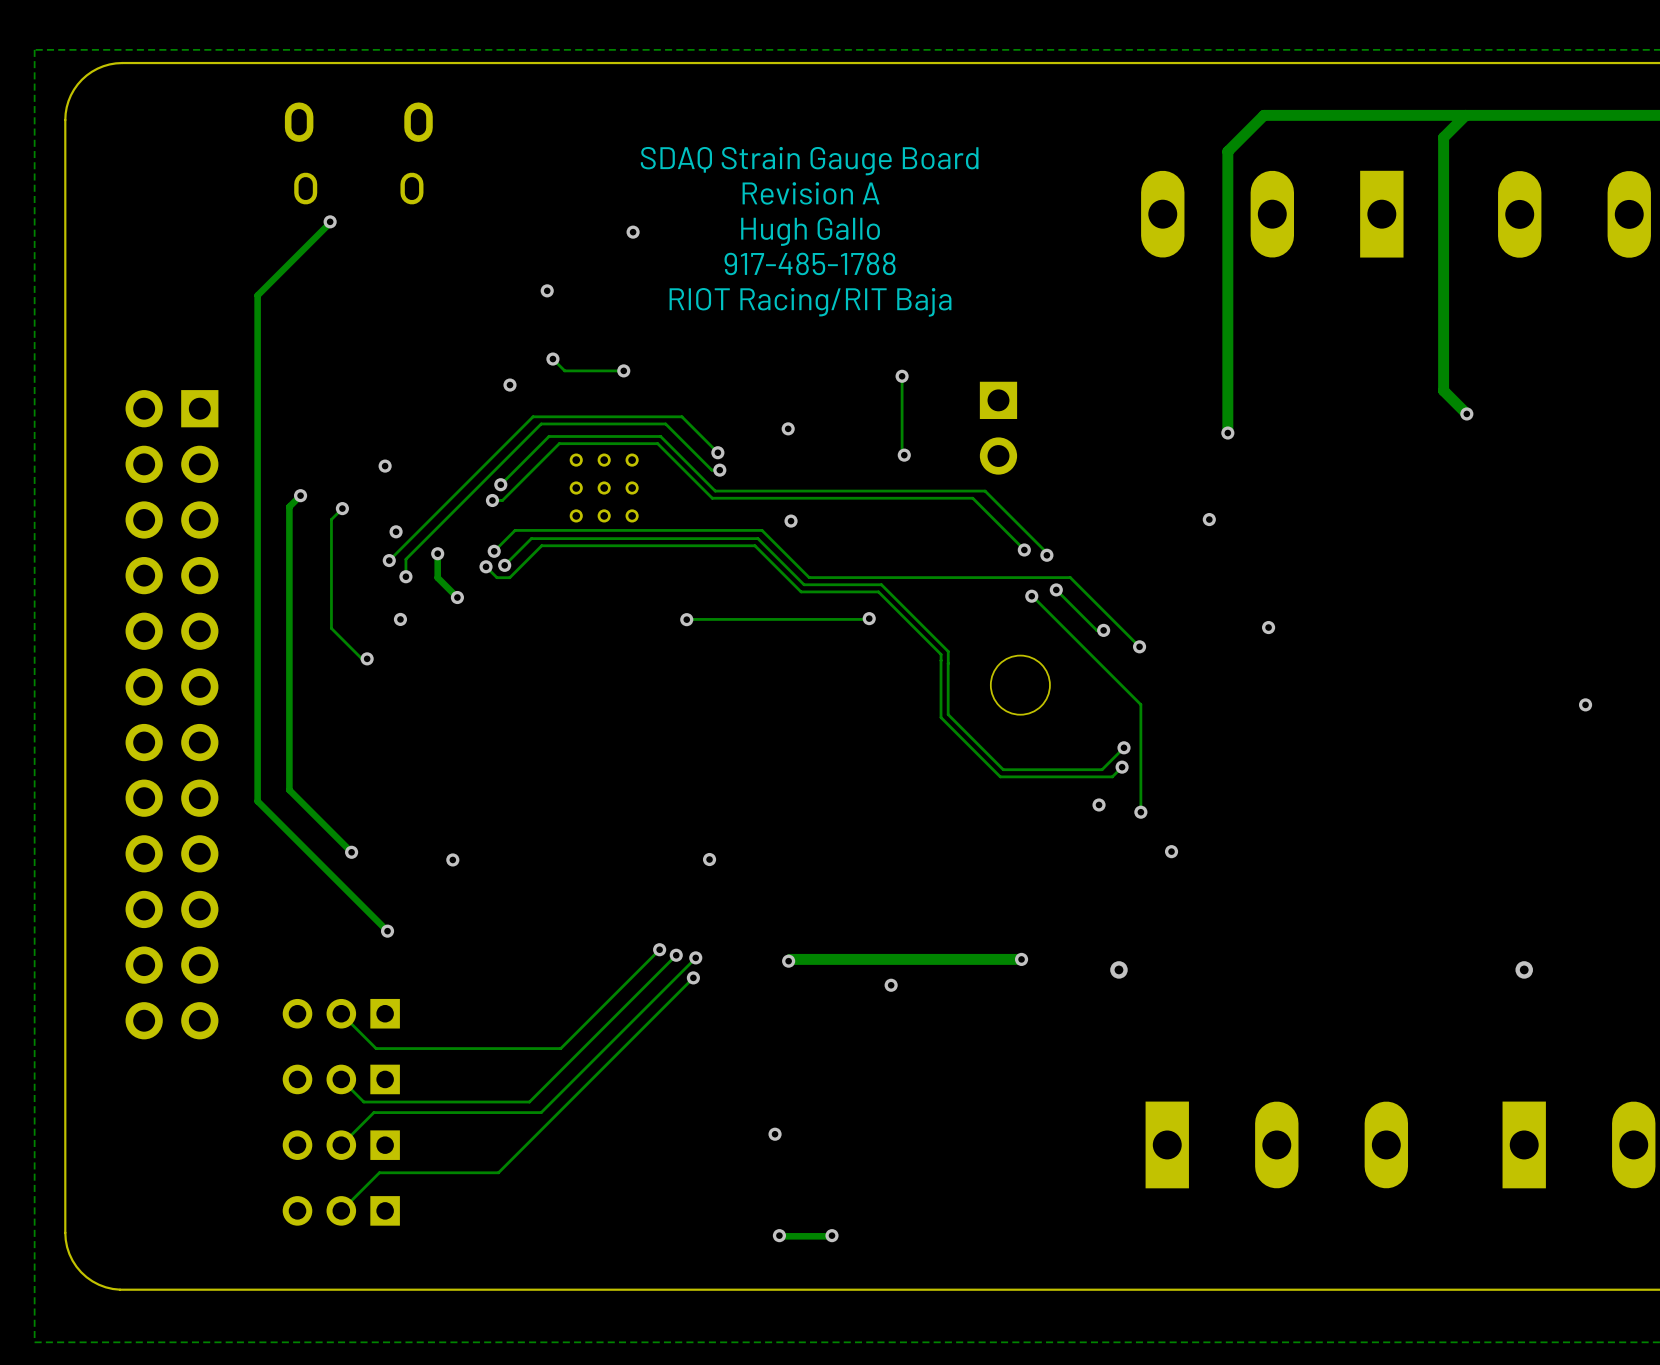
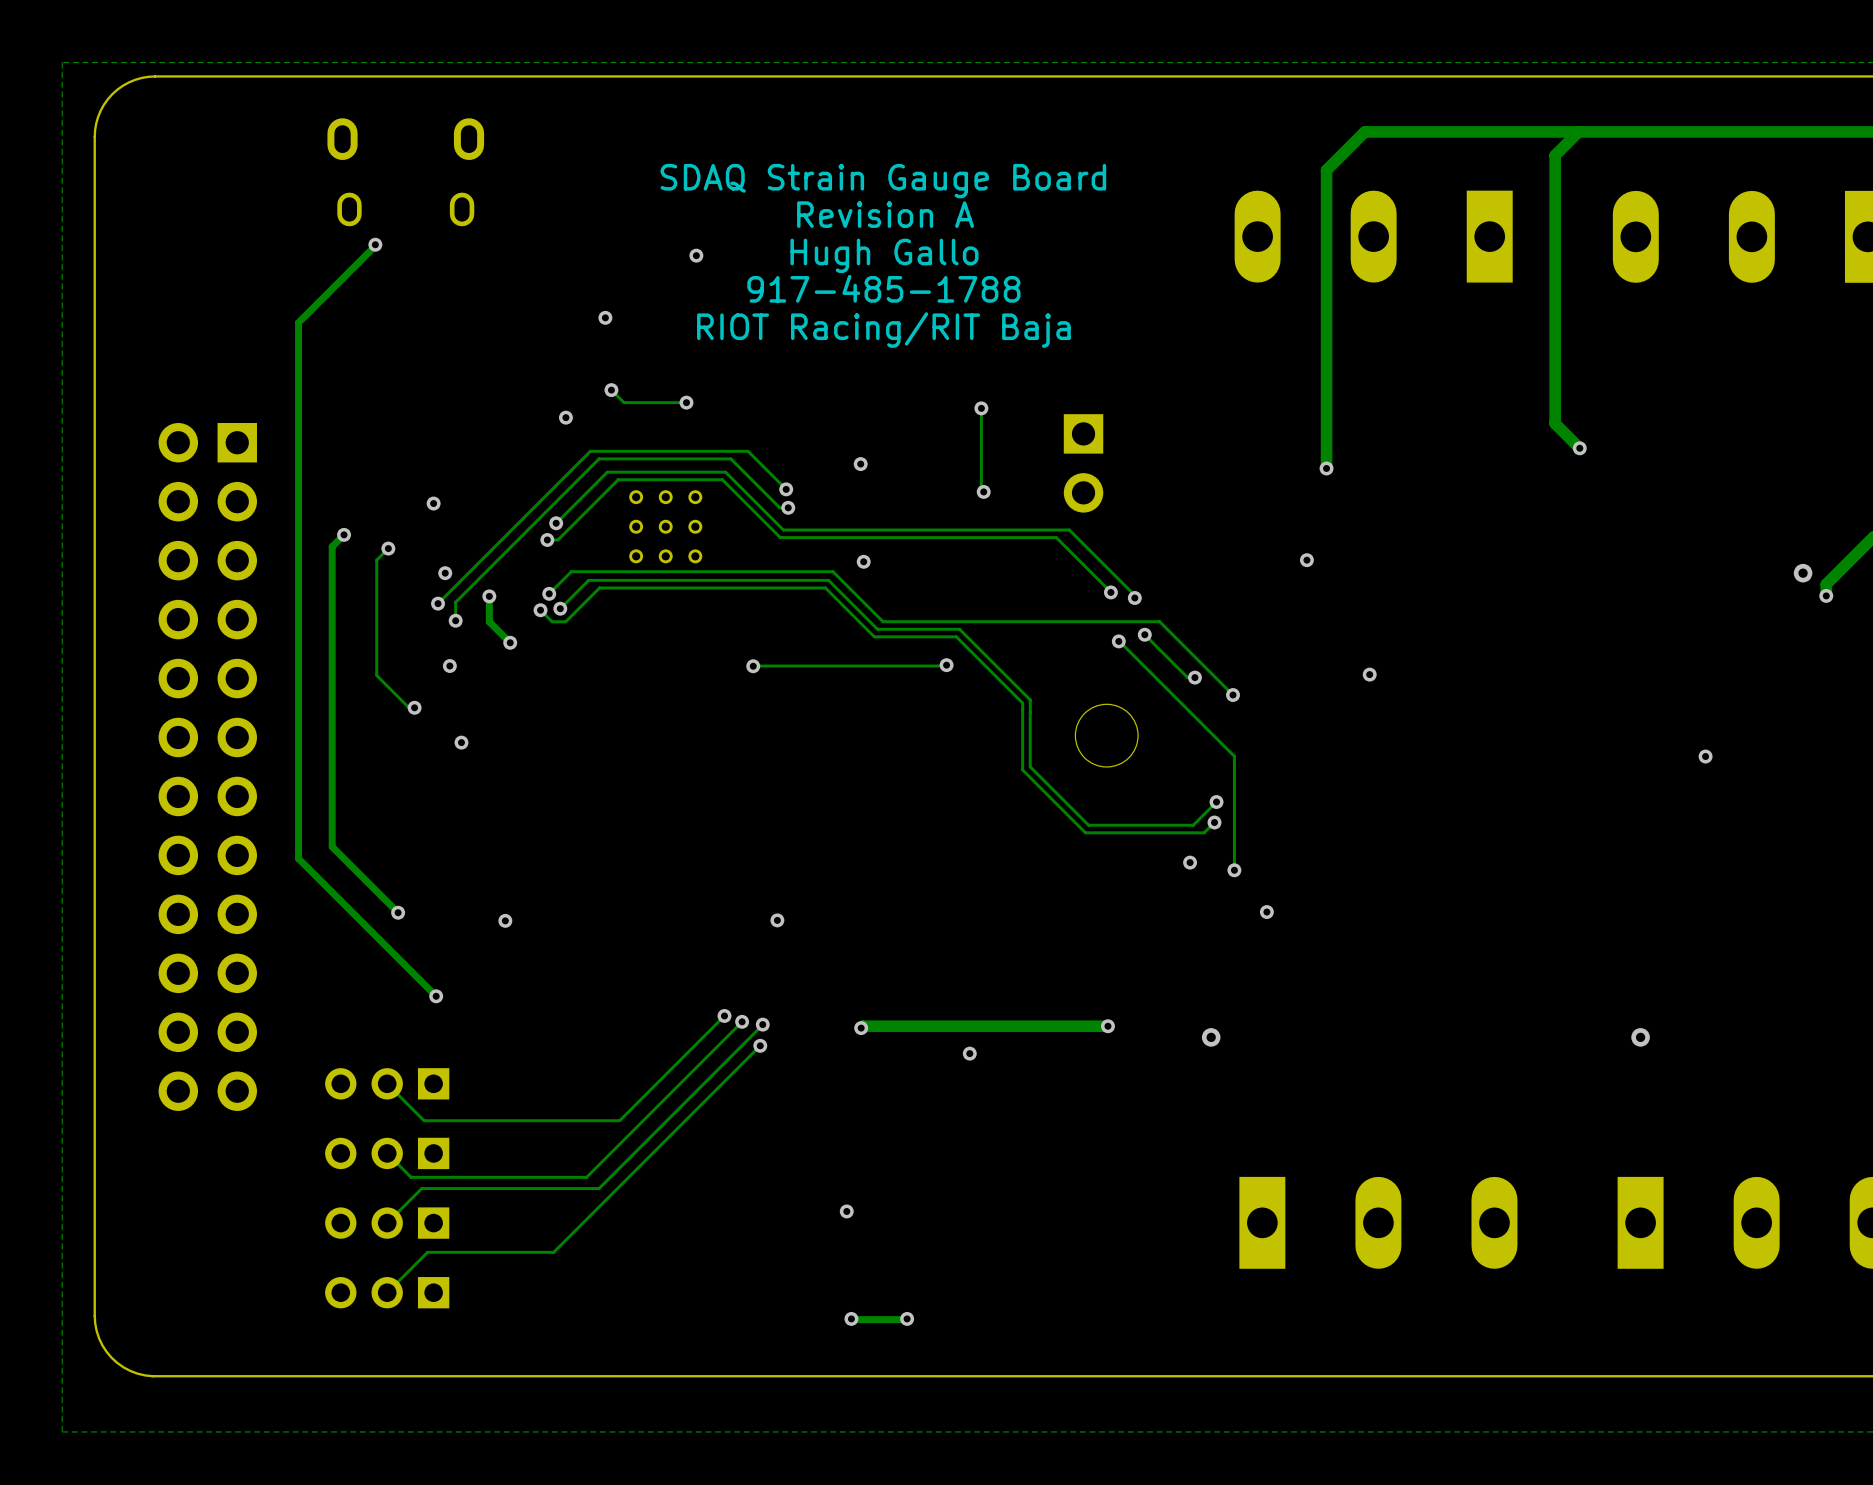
via: none -> (461, 742)

